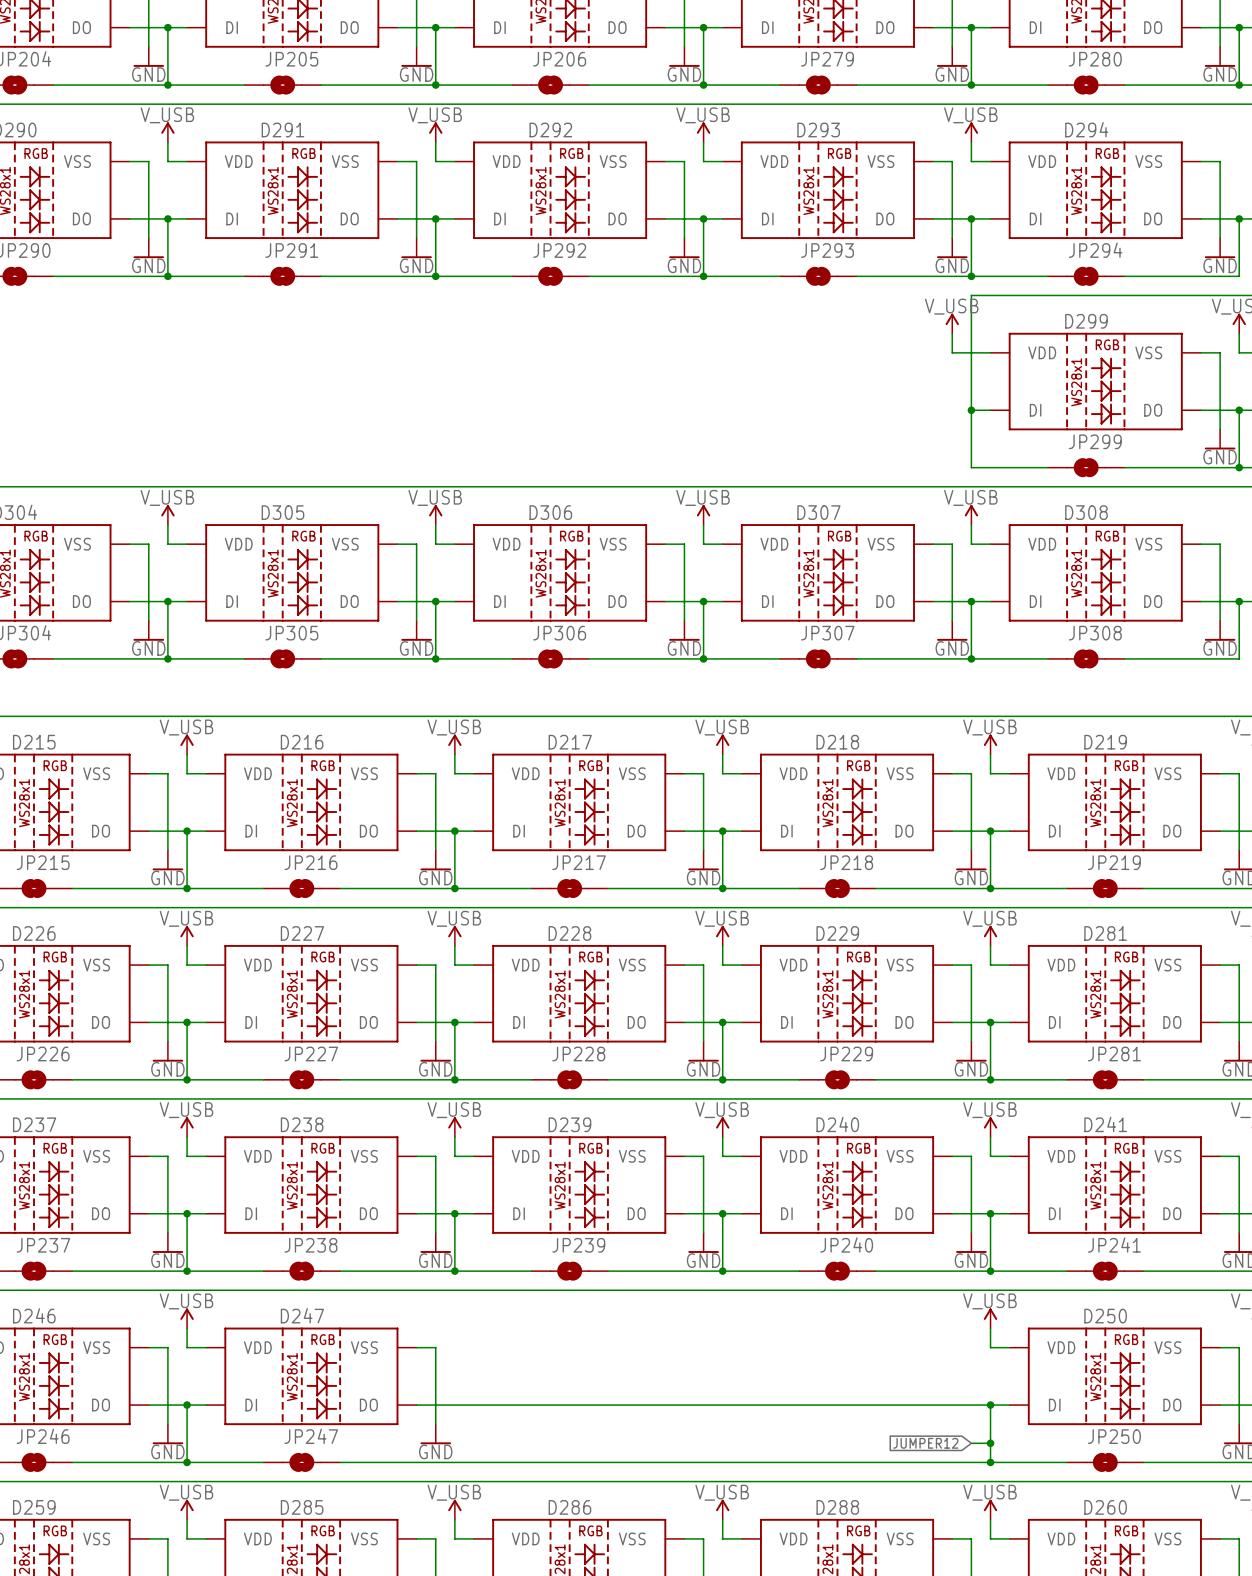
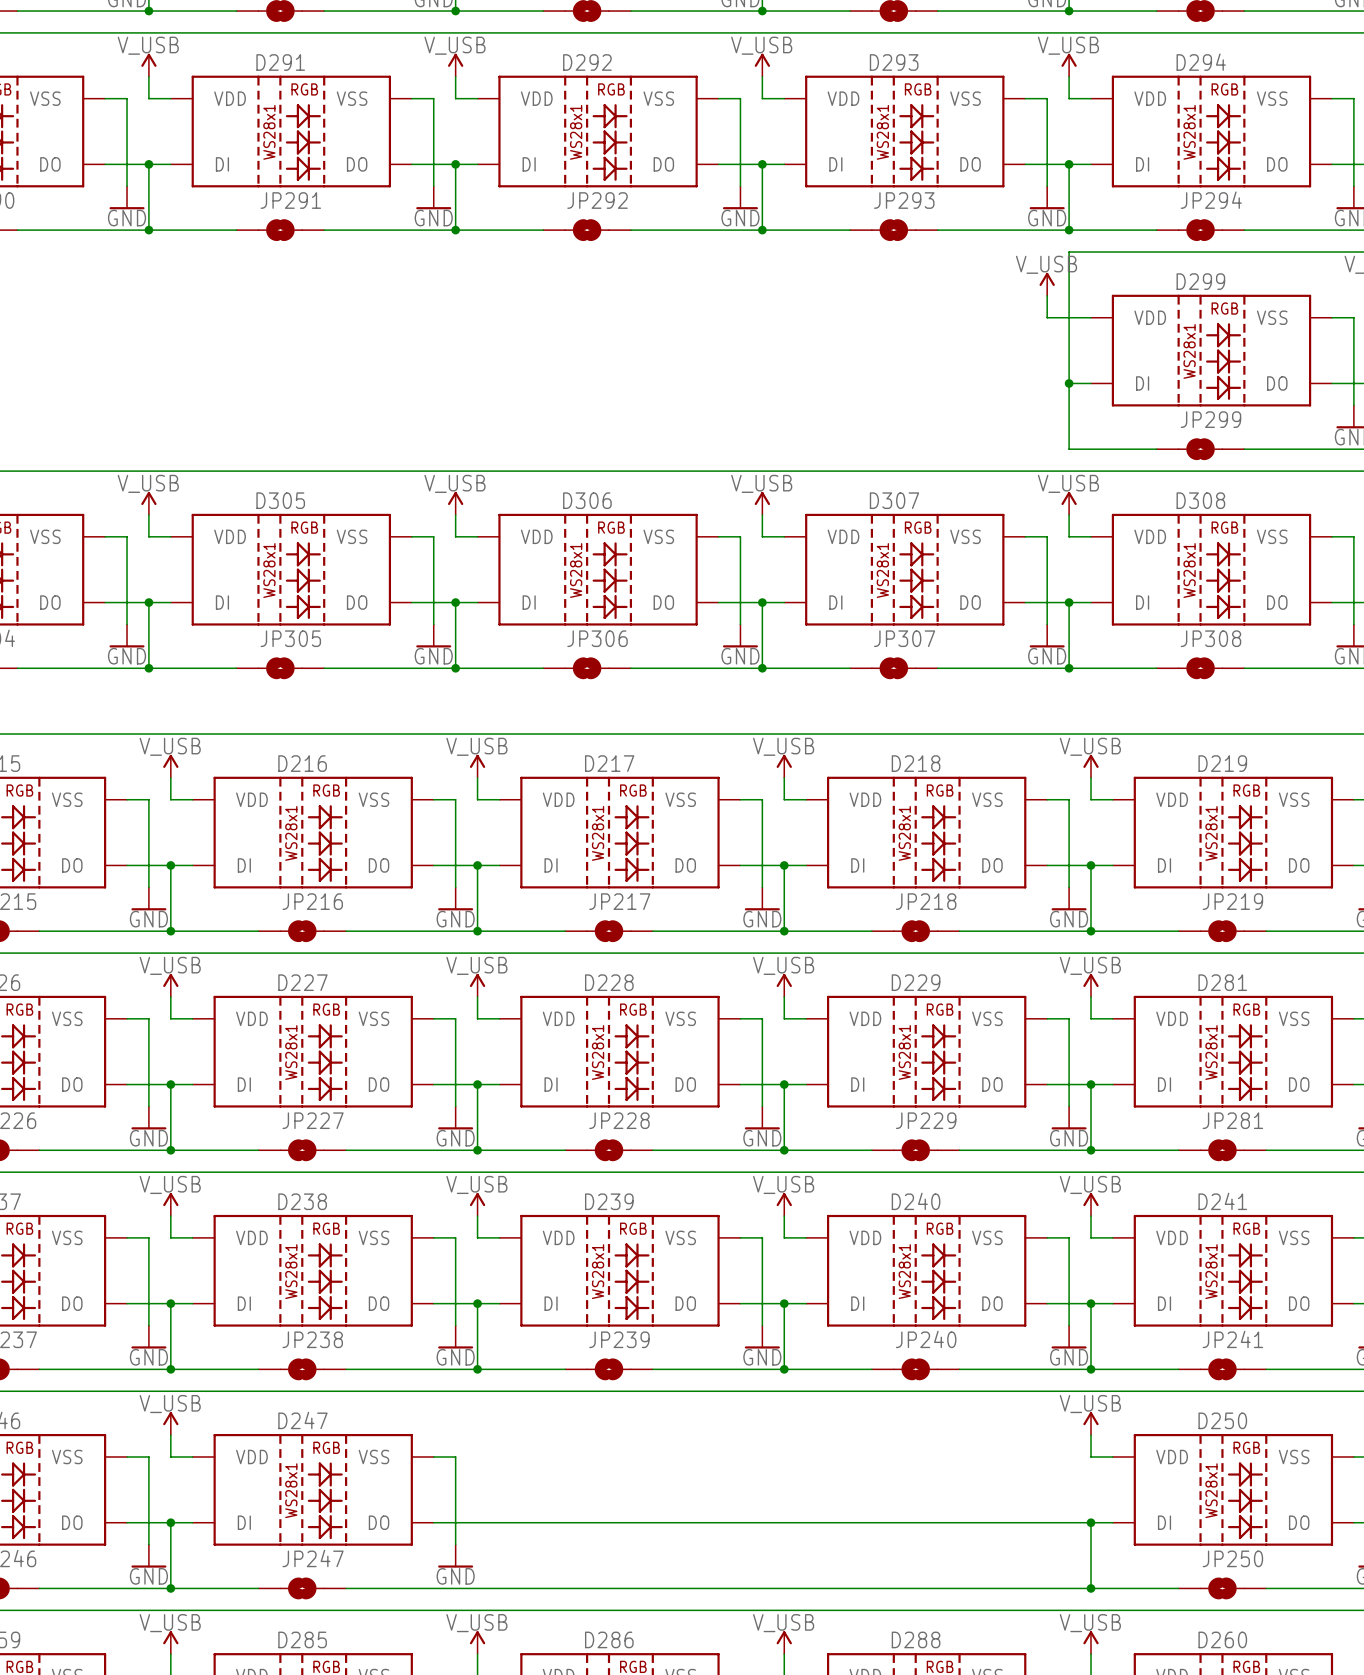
global label: JUMPER12 (925, 1443) -> none
wire: (971, 1443) (990, 1443) -> none
junction: (990, 1443) -> none

